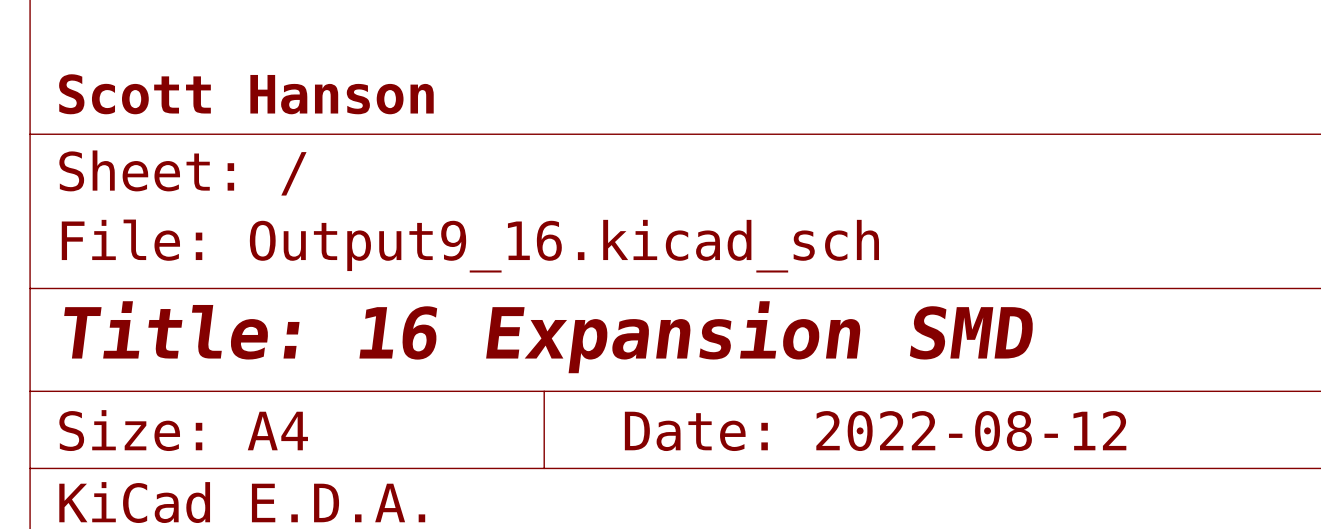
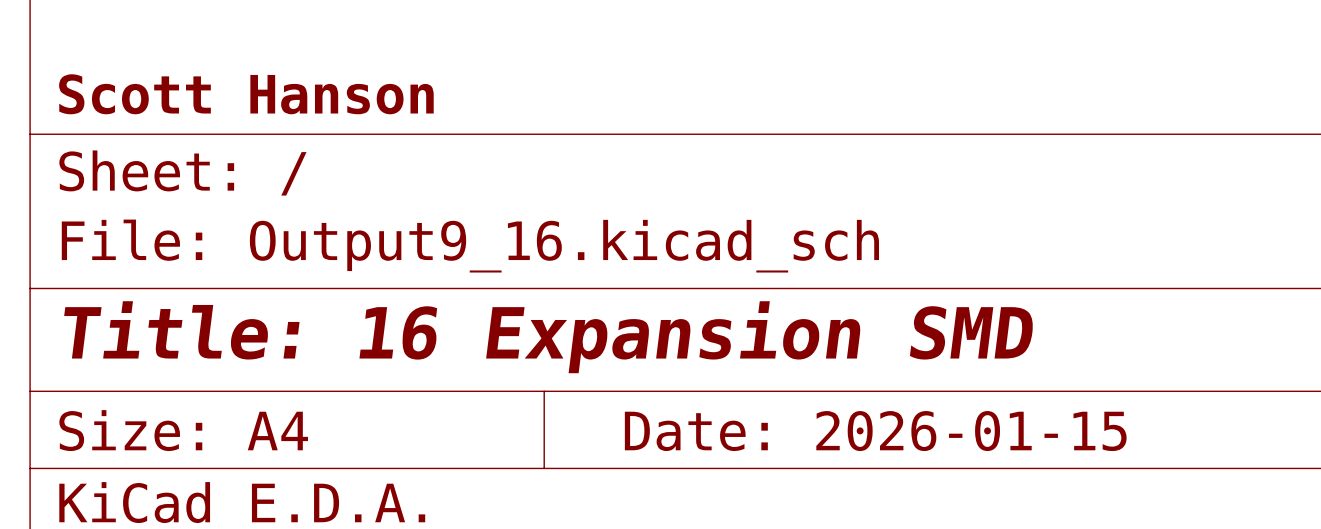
title block: Date: 2022-08-12 (875, 431) -> Date: 2026-01-15 (875, 431)

